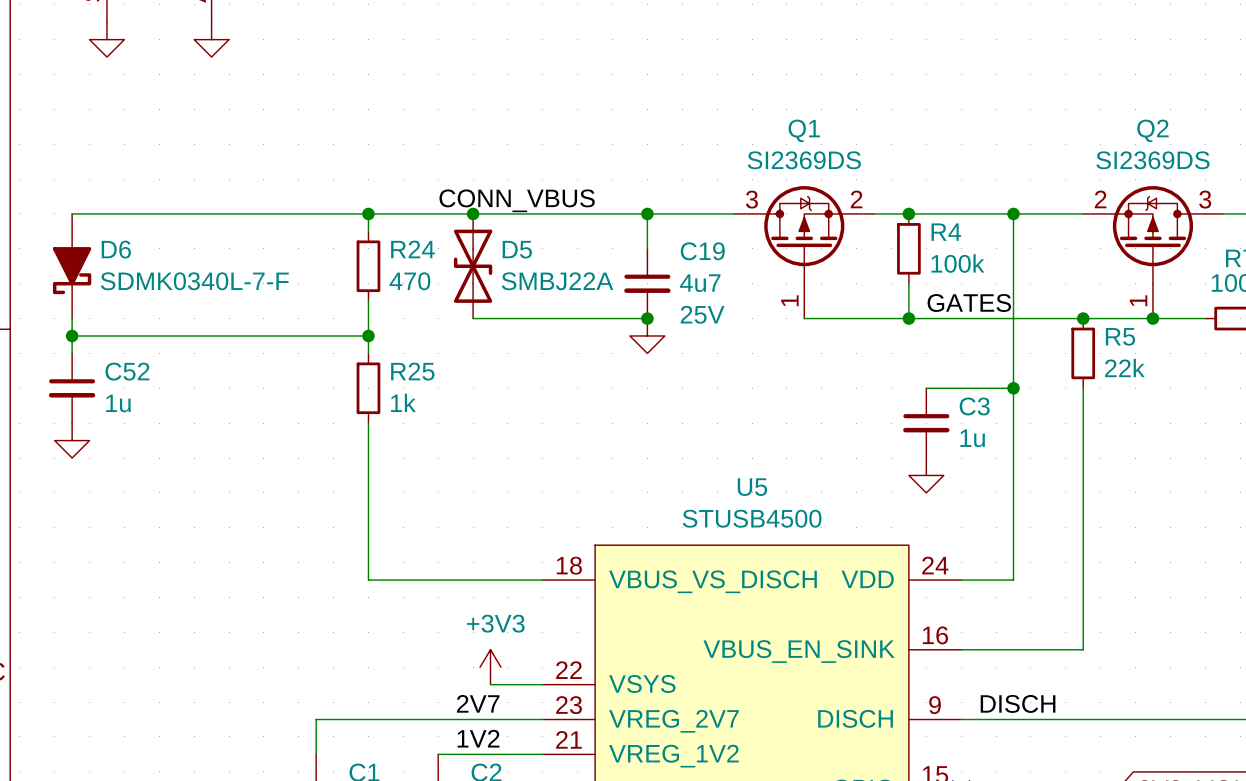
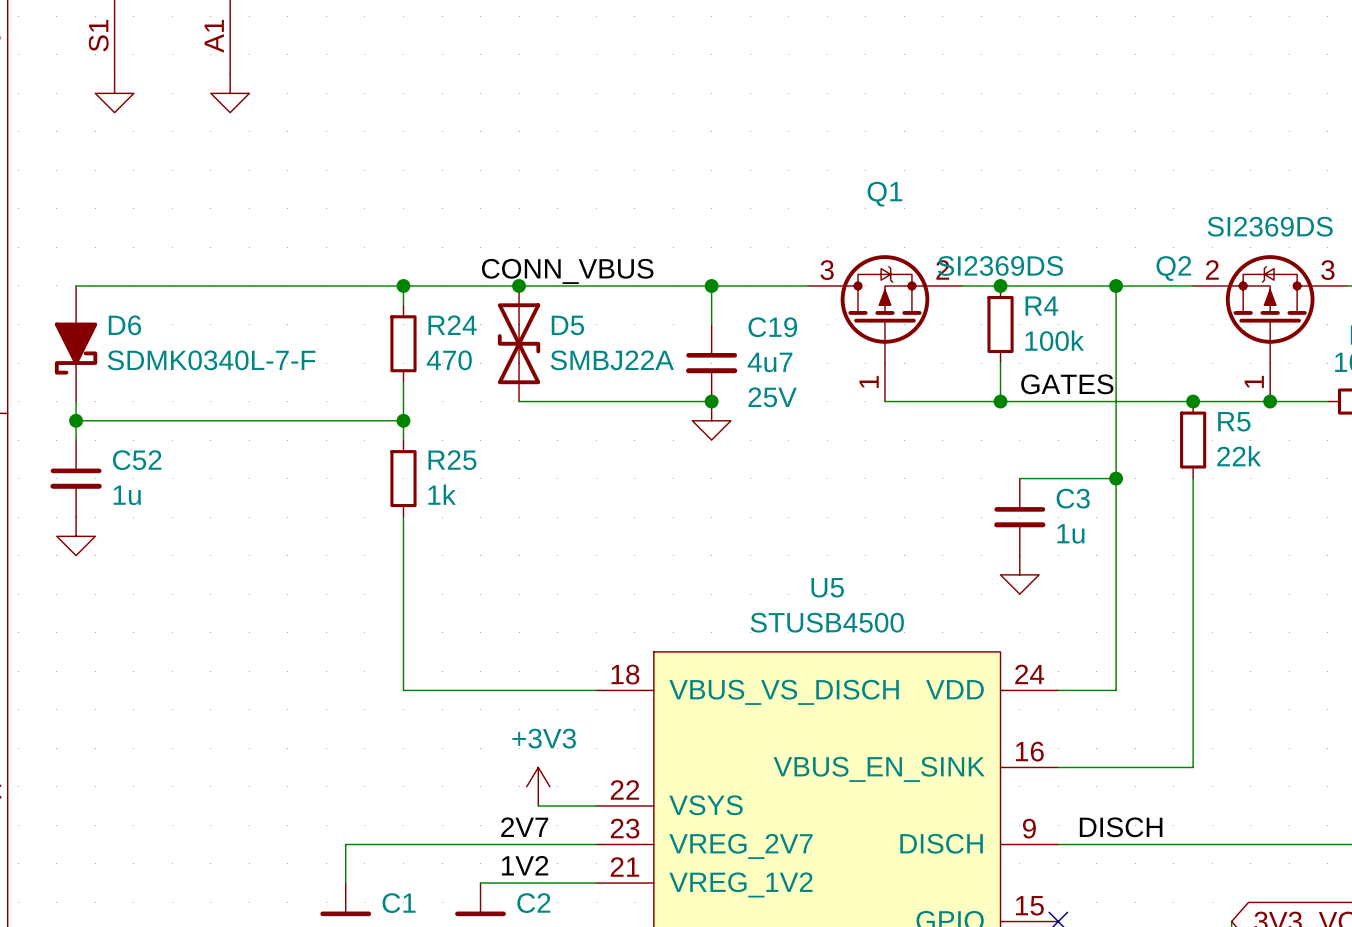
Q2 name position: Q2 (1152, 130) -> Q2 (1173, 268)
Q1 value position: SI2369DS (804, 160) -> SI2369DS (1000, 265)

